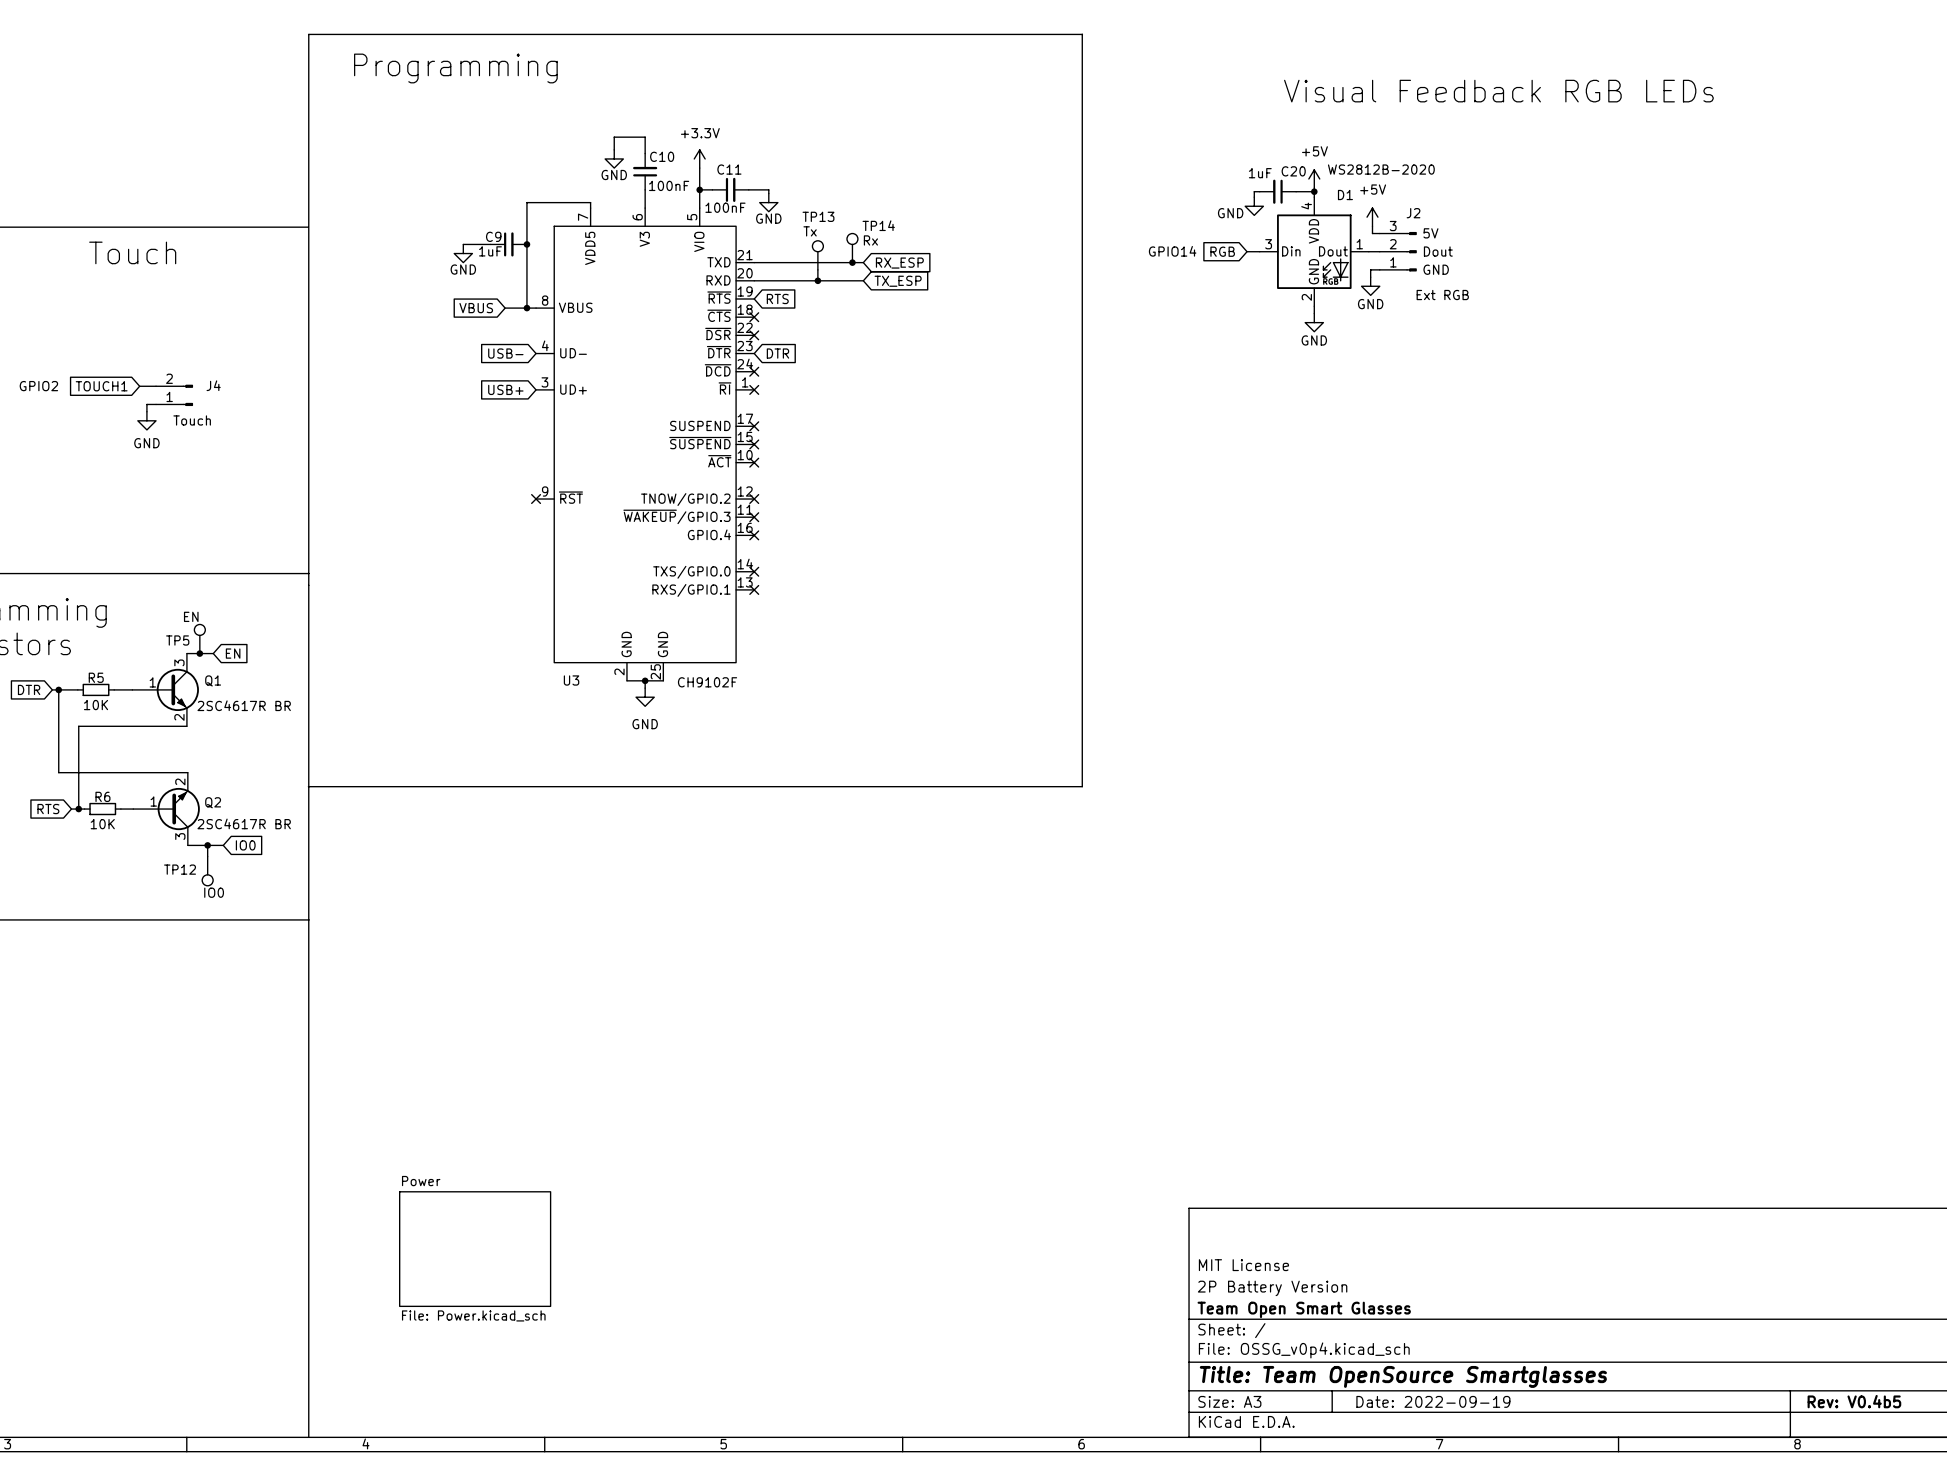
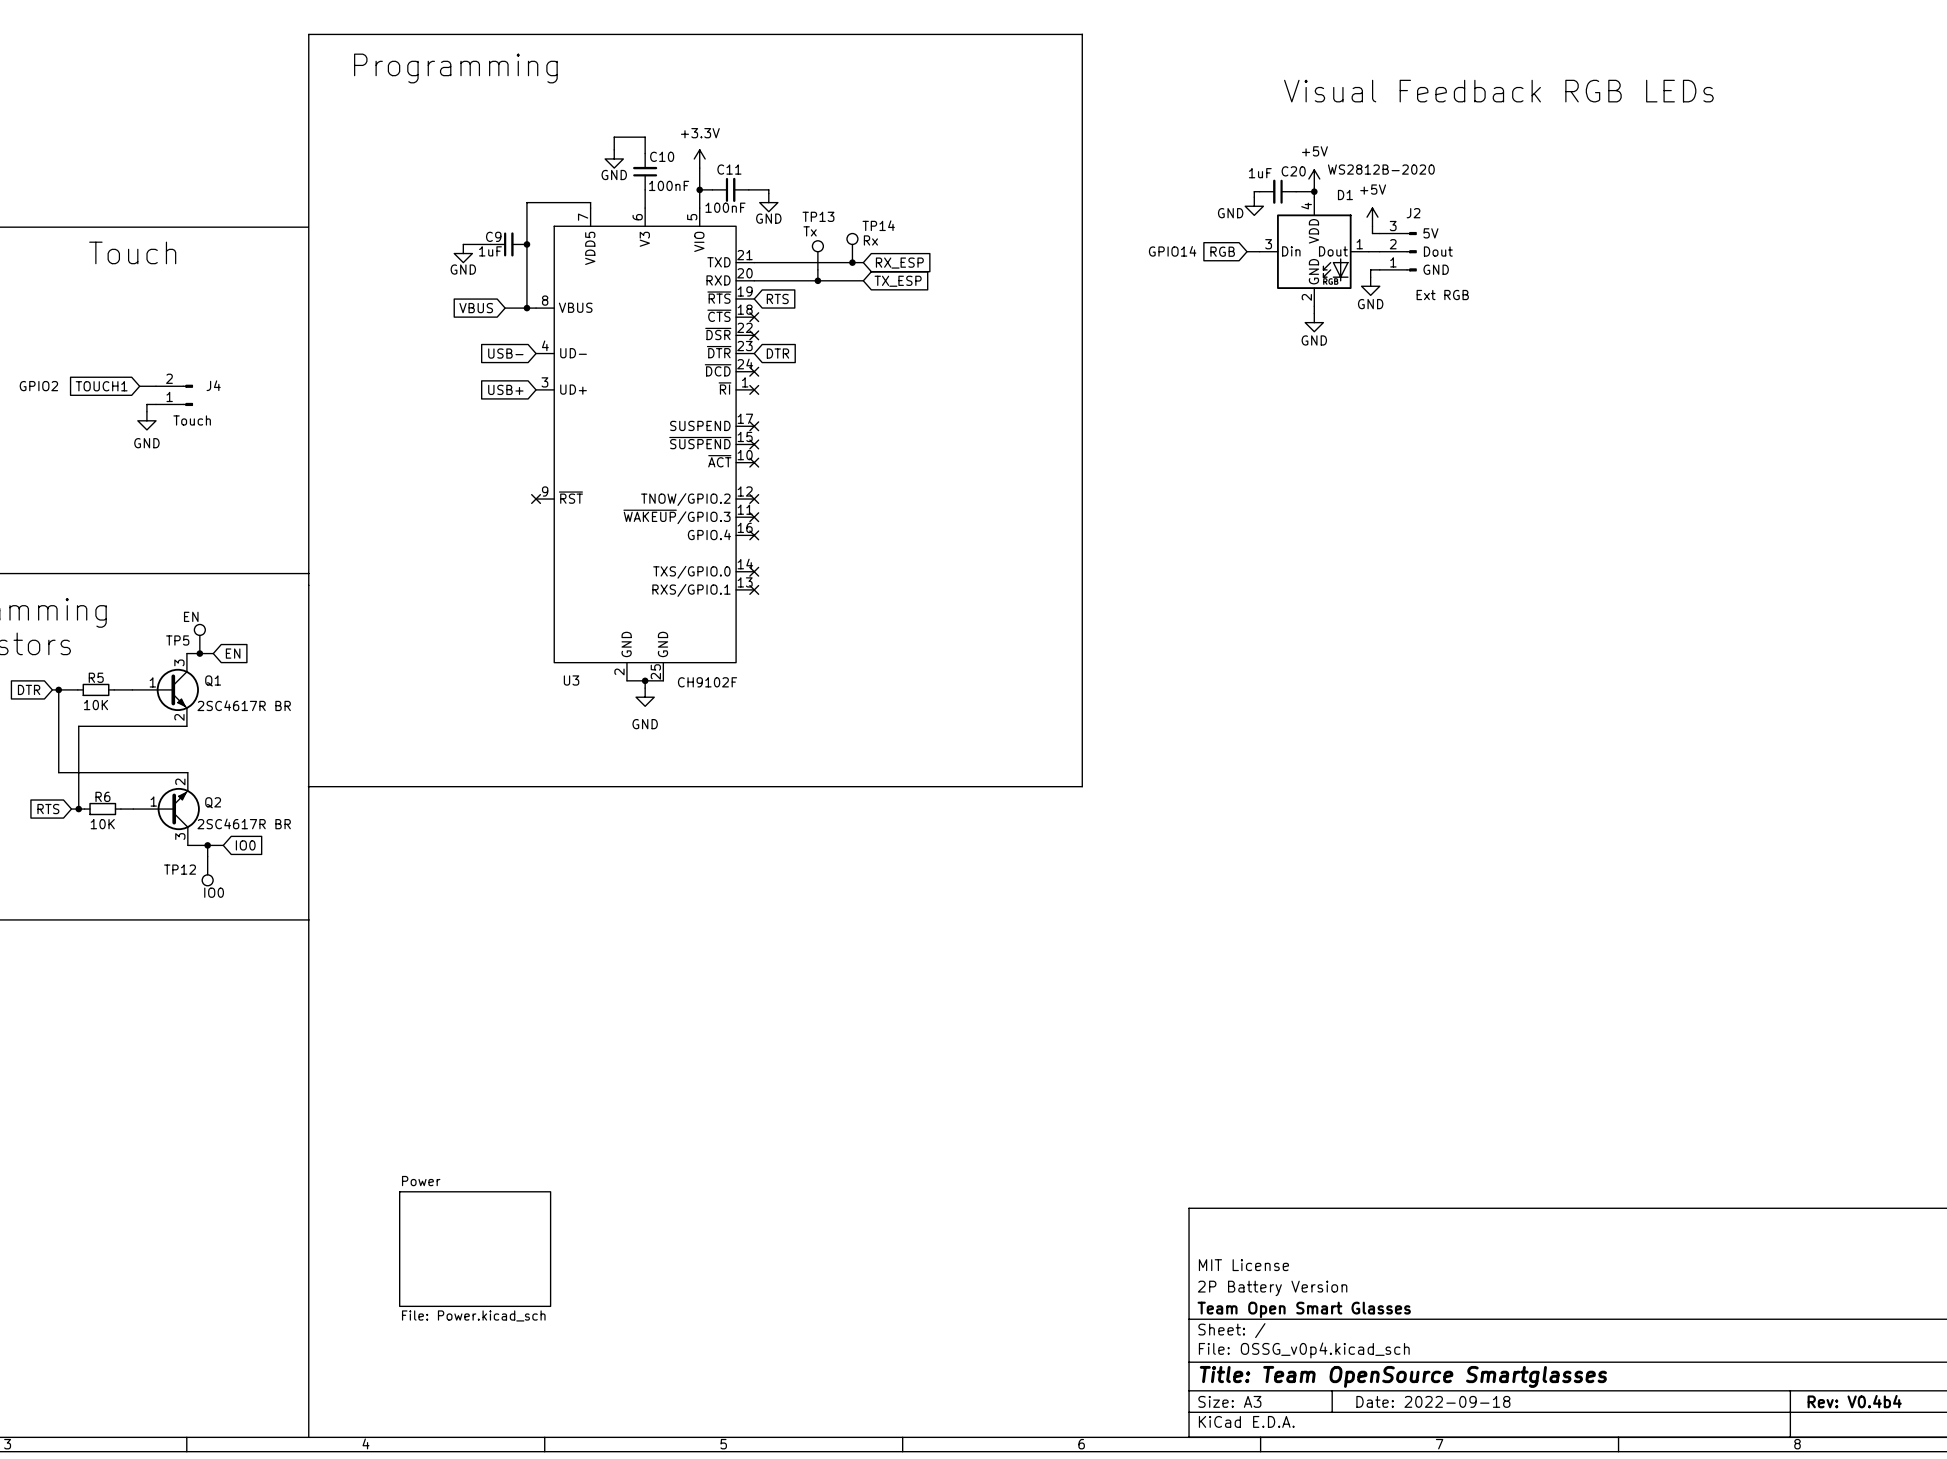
title block: Date: 2022-09-19 (1433, 1401) -> Date: 2022-09-18 (1433, 1401)
title block: Rev: V0.4b5 (1854, 1401) -> Rev: V0.4b4 (1854, 1401)

